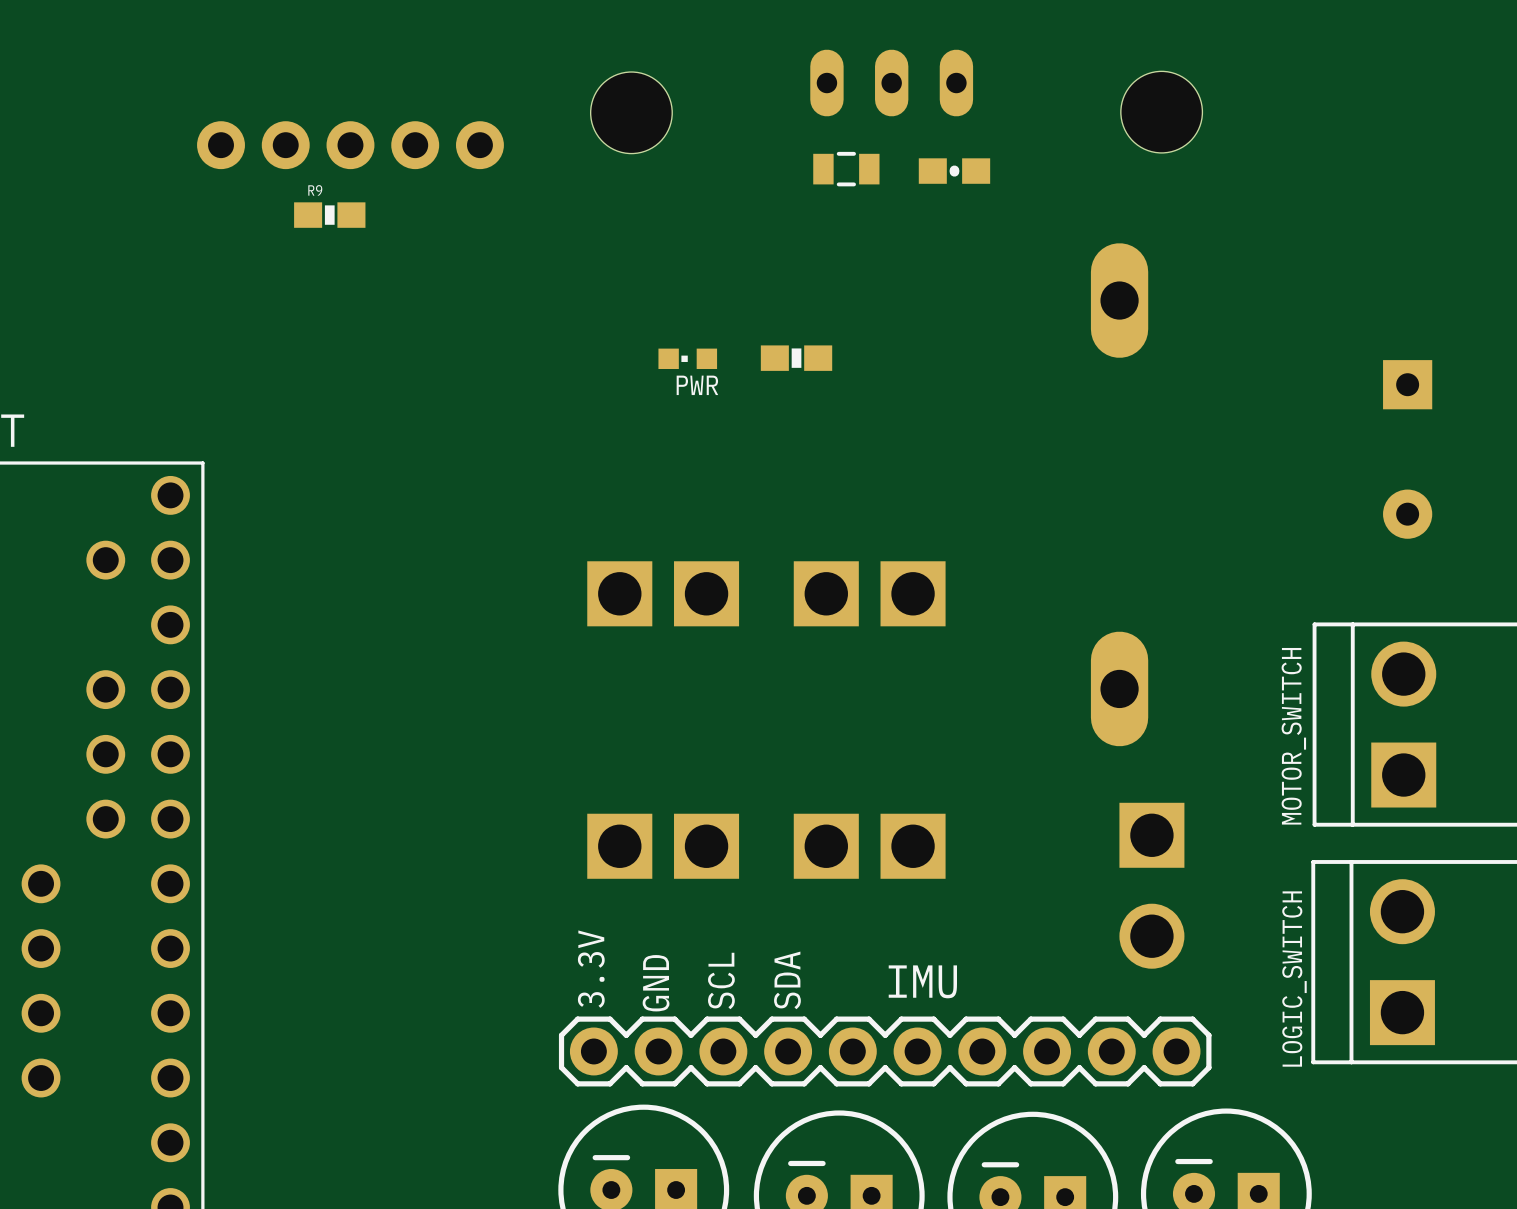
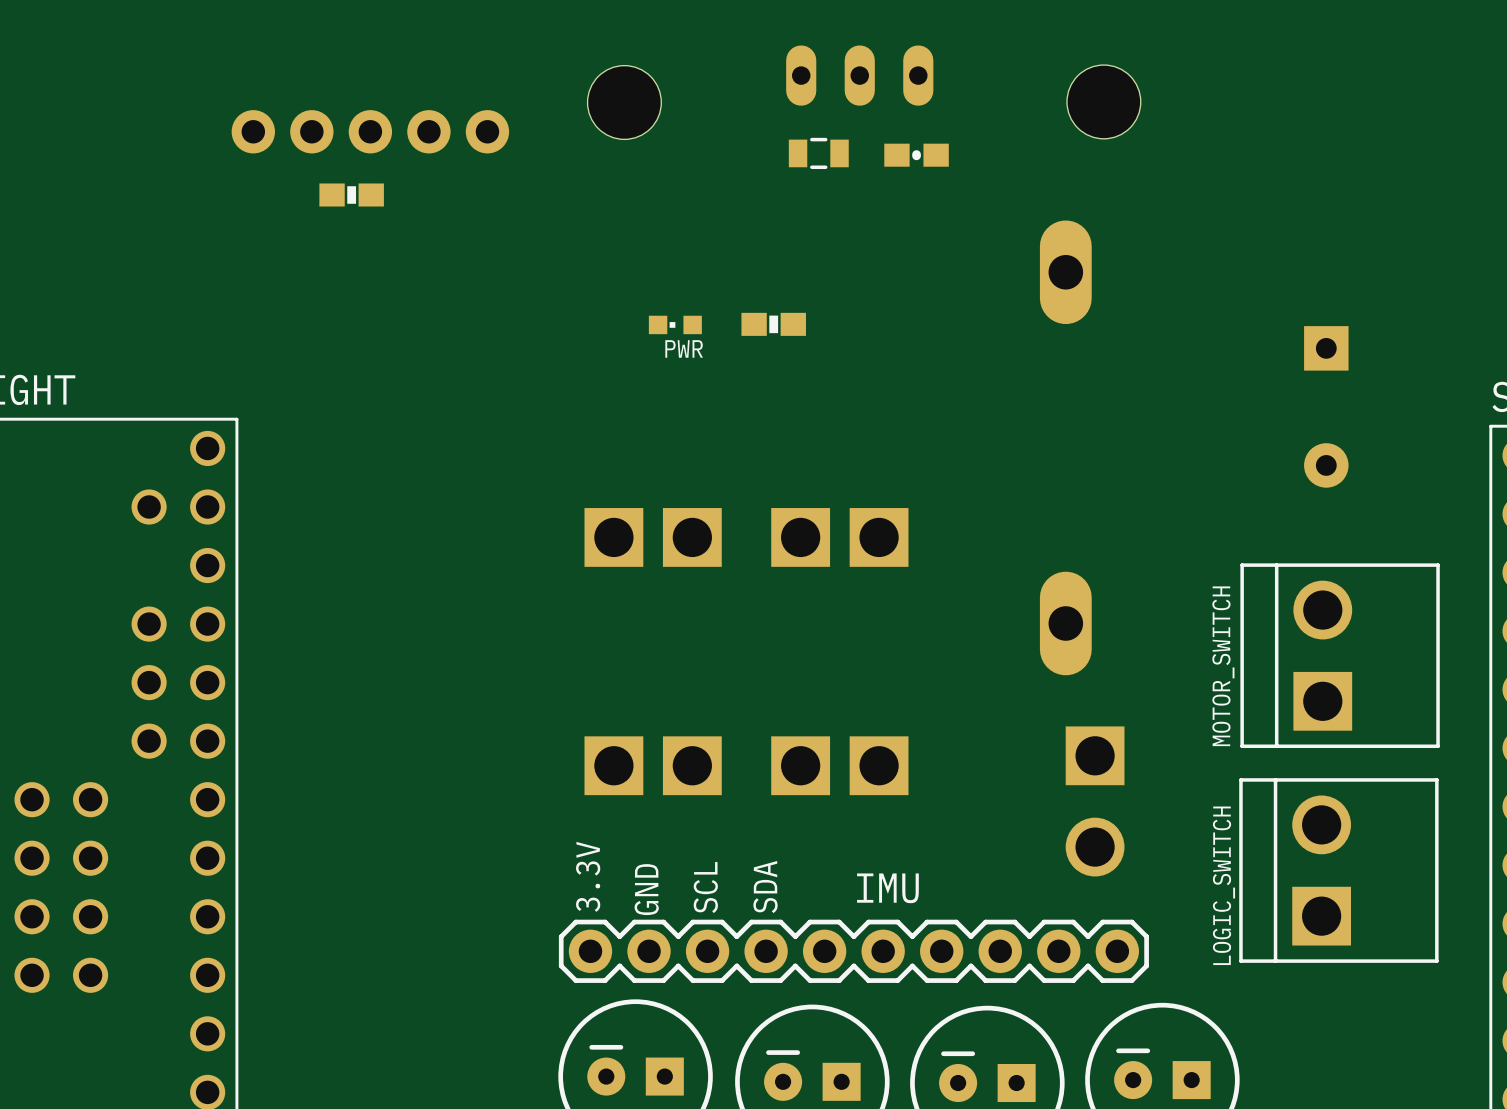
R9 name: R9 (315, 190) -> none

